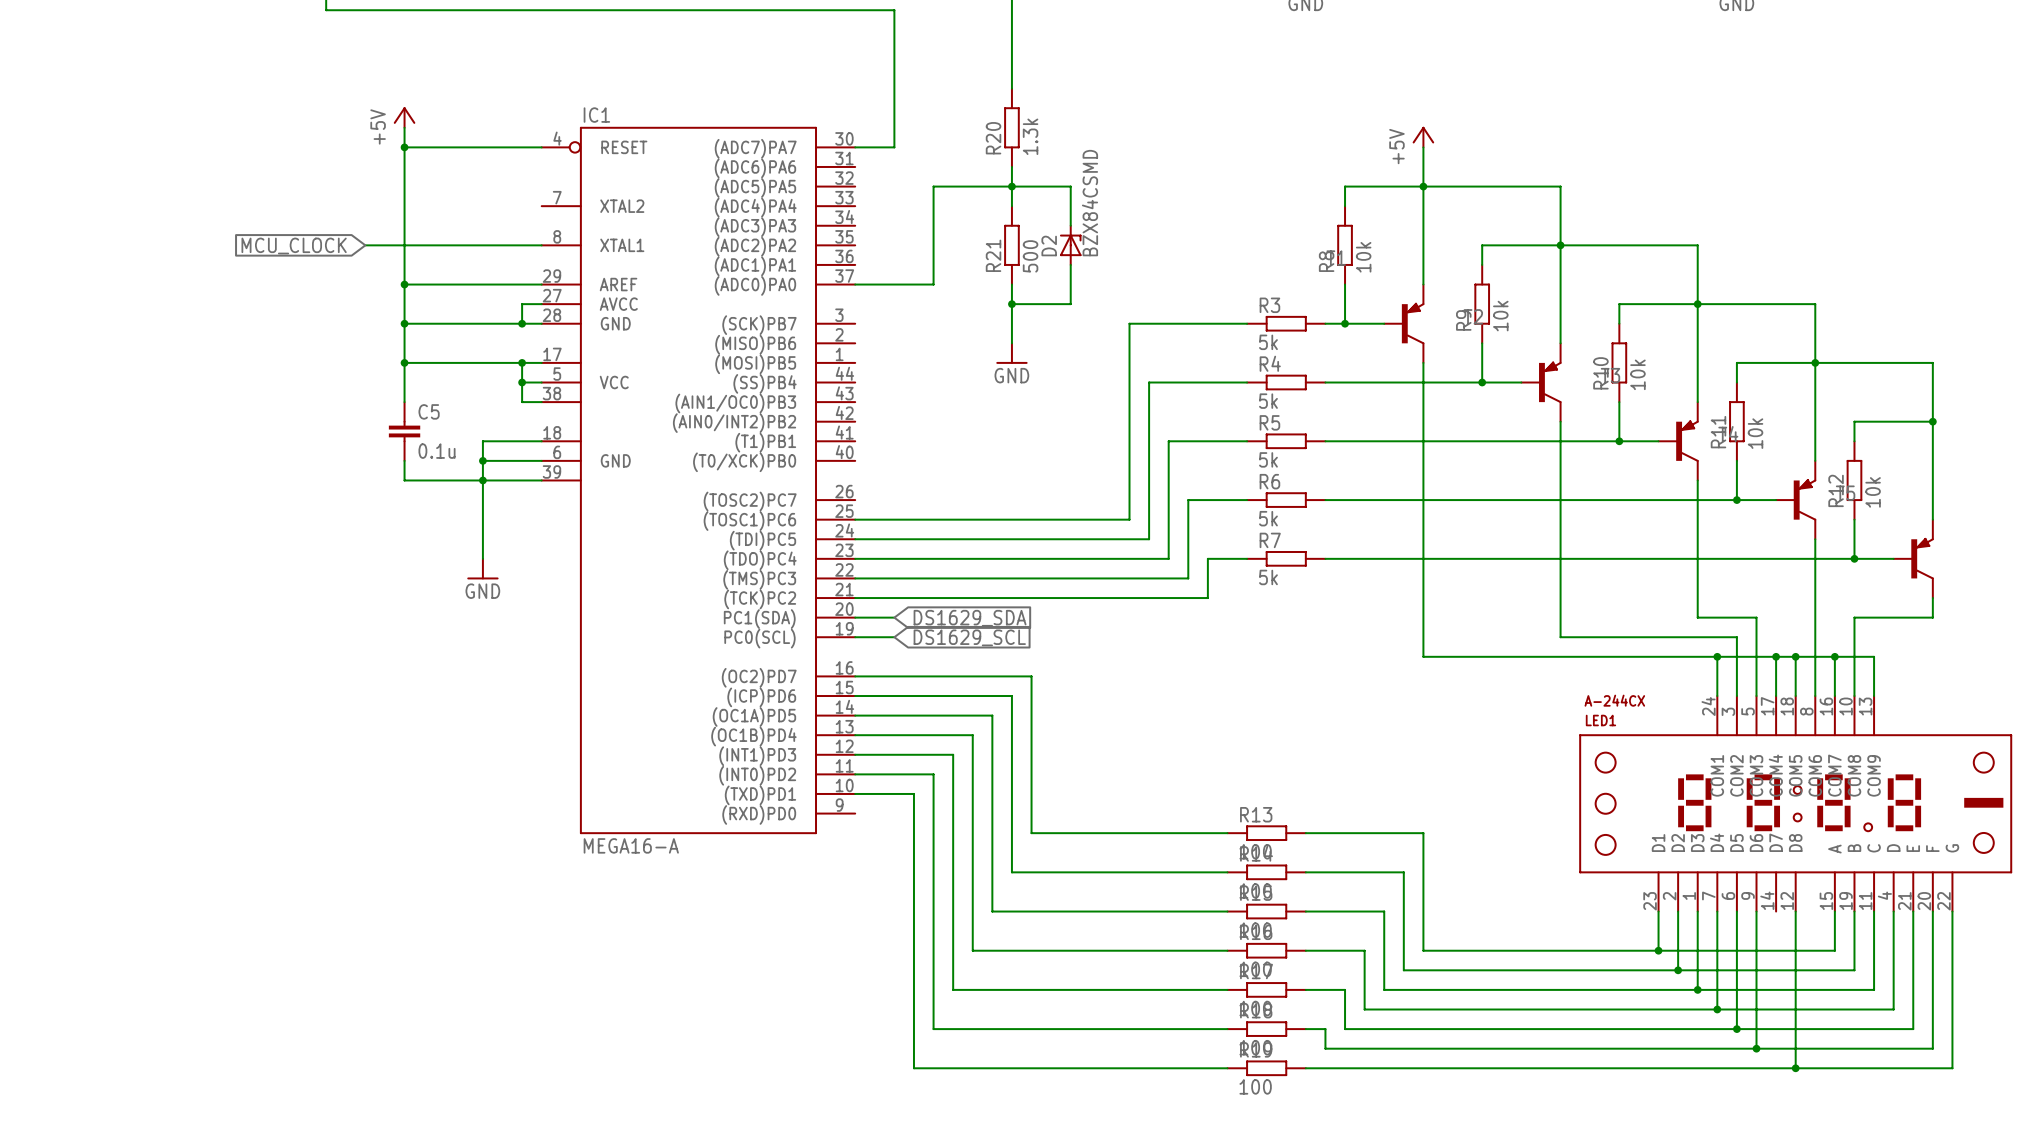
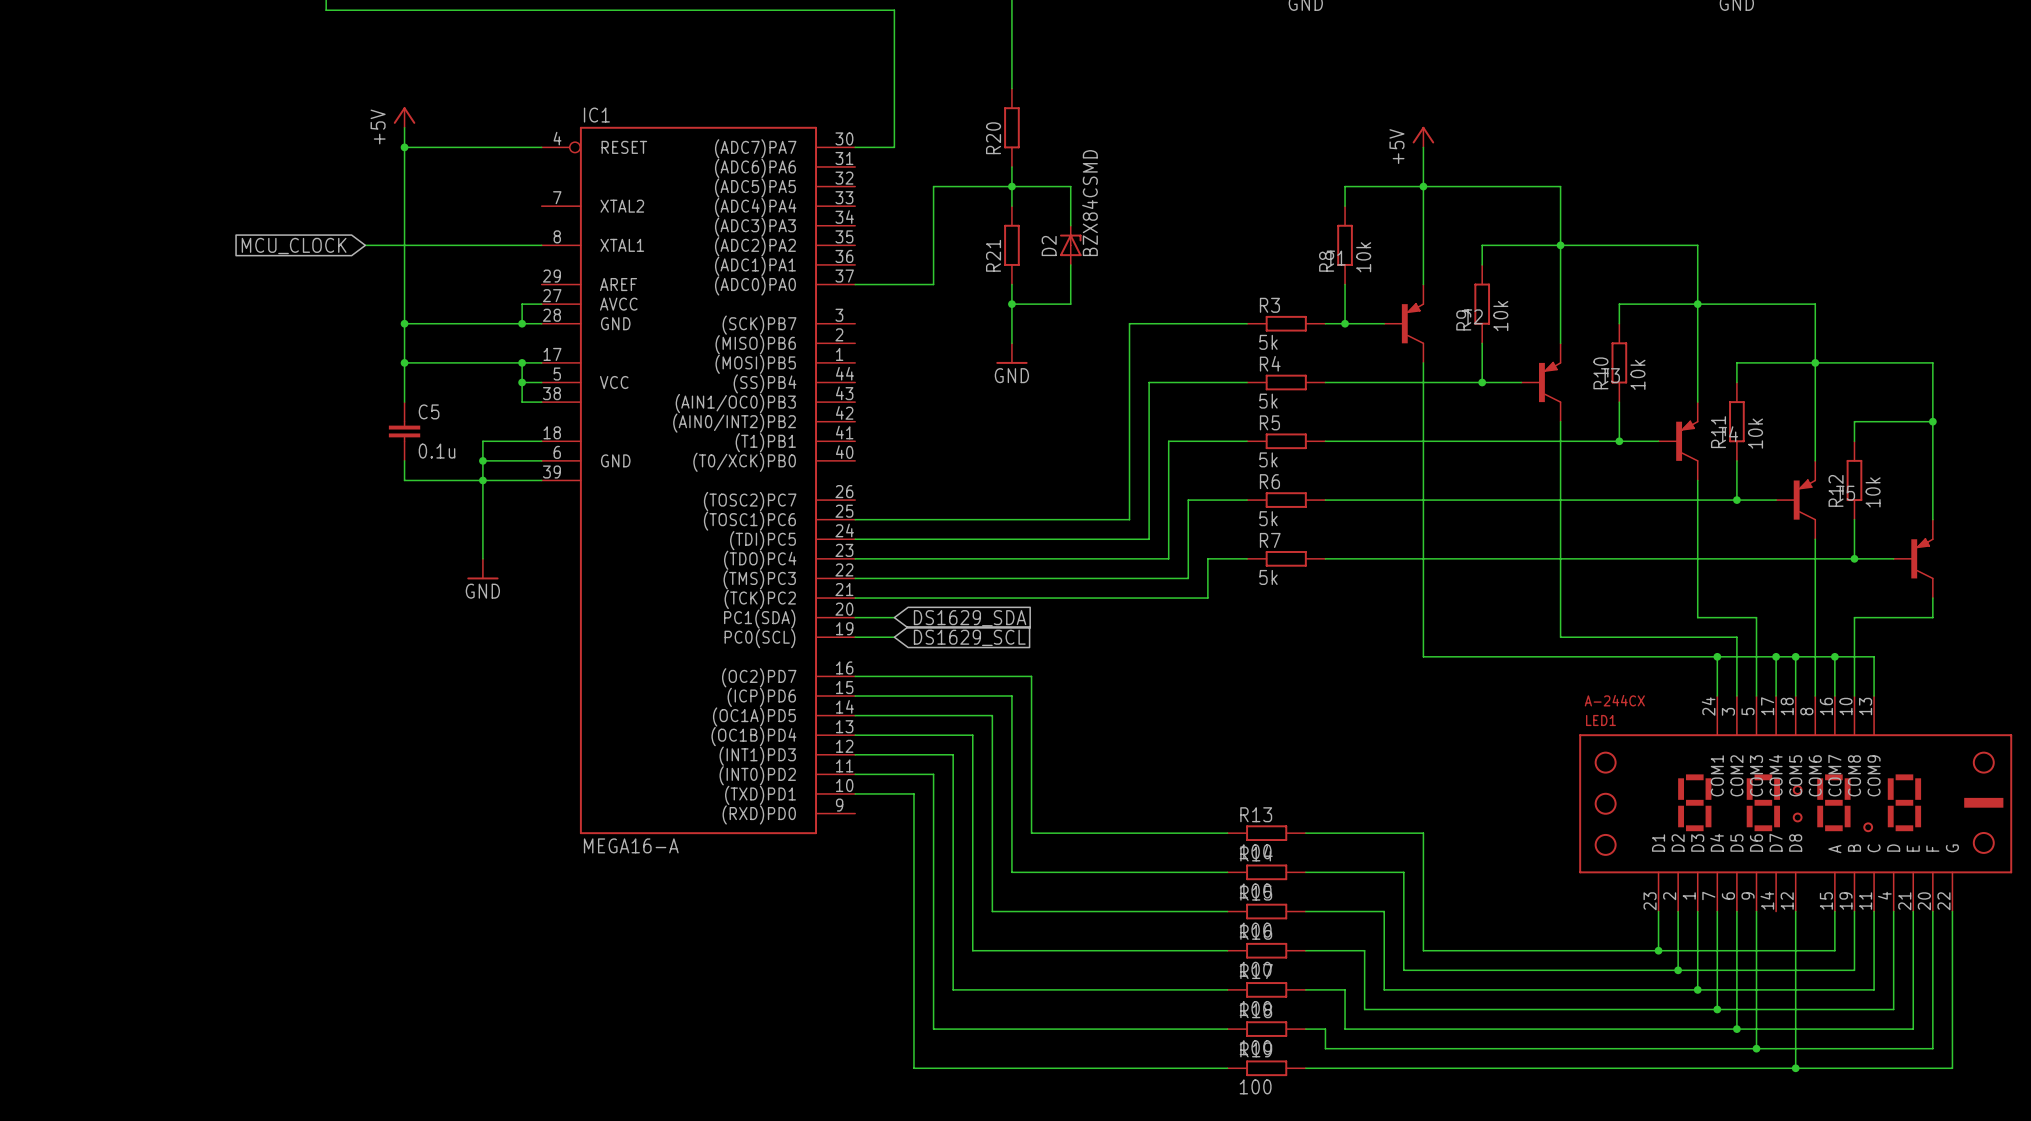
R20 value: 1.3k (1030, 136) -> none
R21 value: 500 (1030, 256) -> none
wire: (404, 284) (541, 284) -> none
junction: (404, 284) -> none

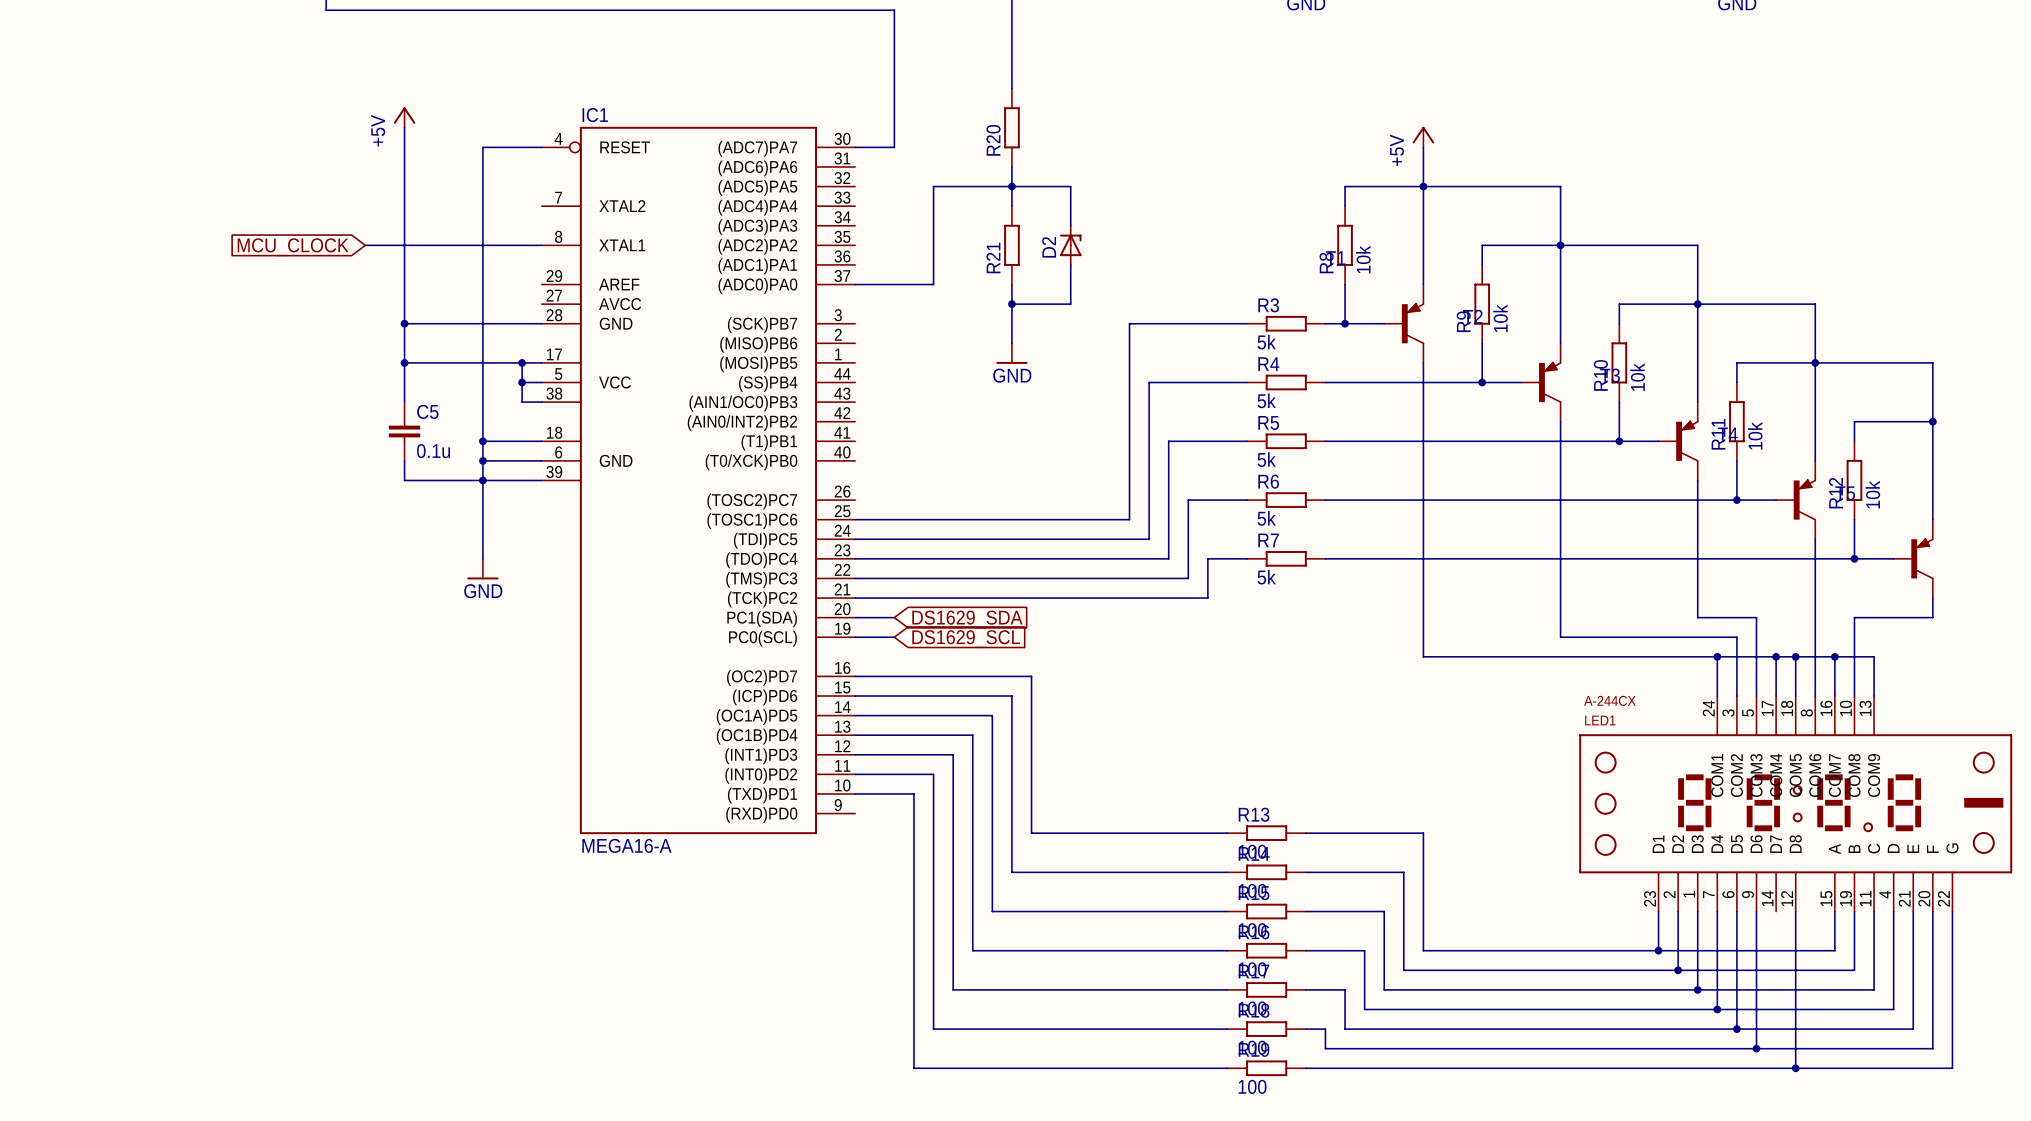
wire: (404, 147) (482, 147) -> (482, 441) (482, 147)
junction: (404, 147) -> none
D2 value: BZX84CSMD (1089, 203) -> none
wire: (541, 304) (522, 304) (522, 323) -> none
junction: (522, 323) -> none
junction: none -> (482, 441)

